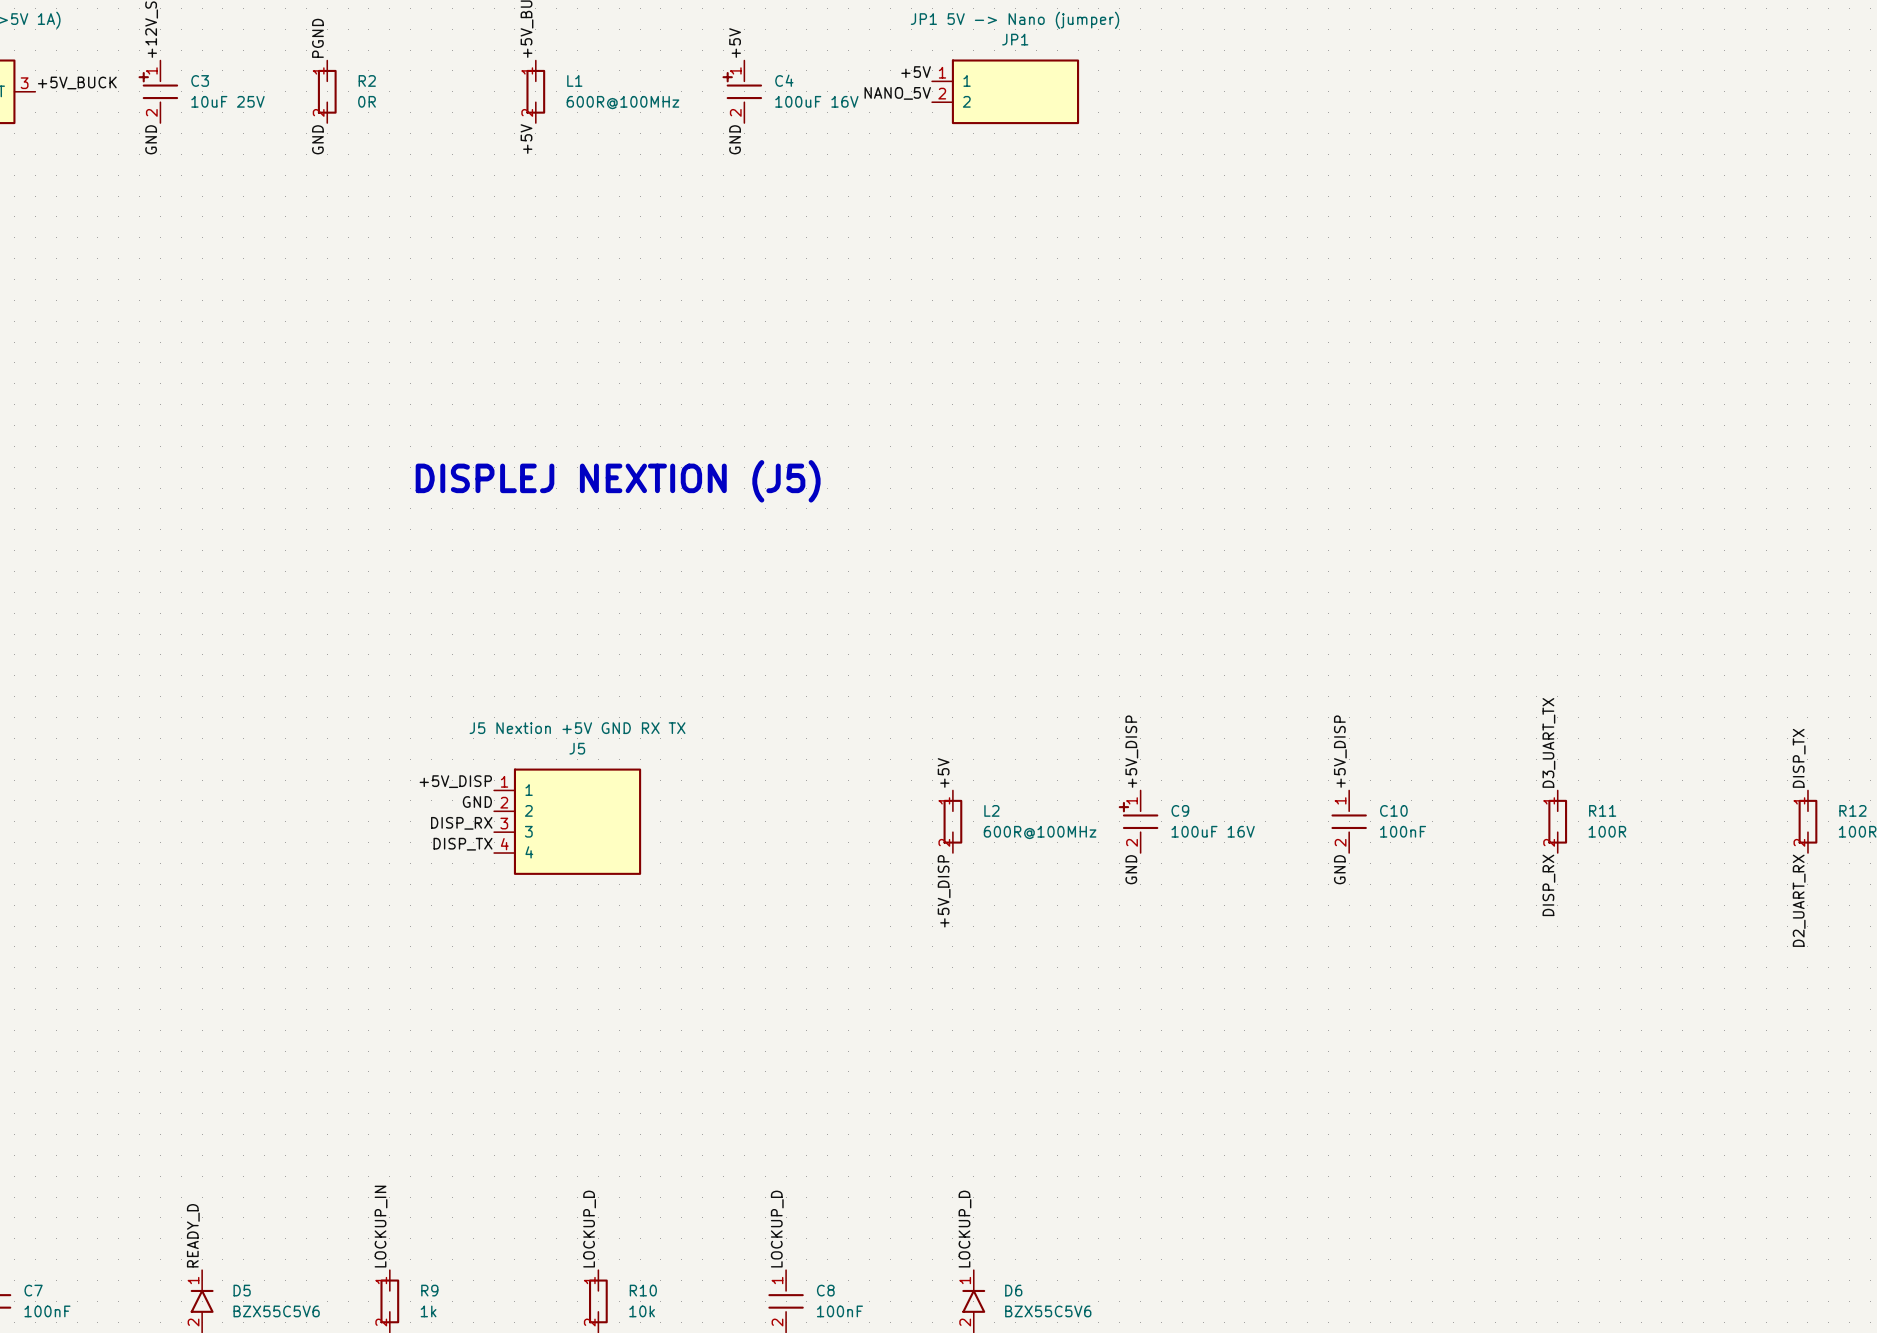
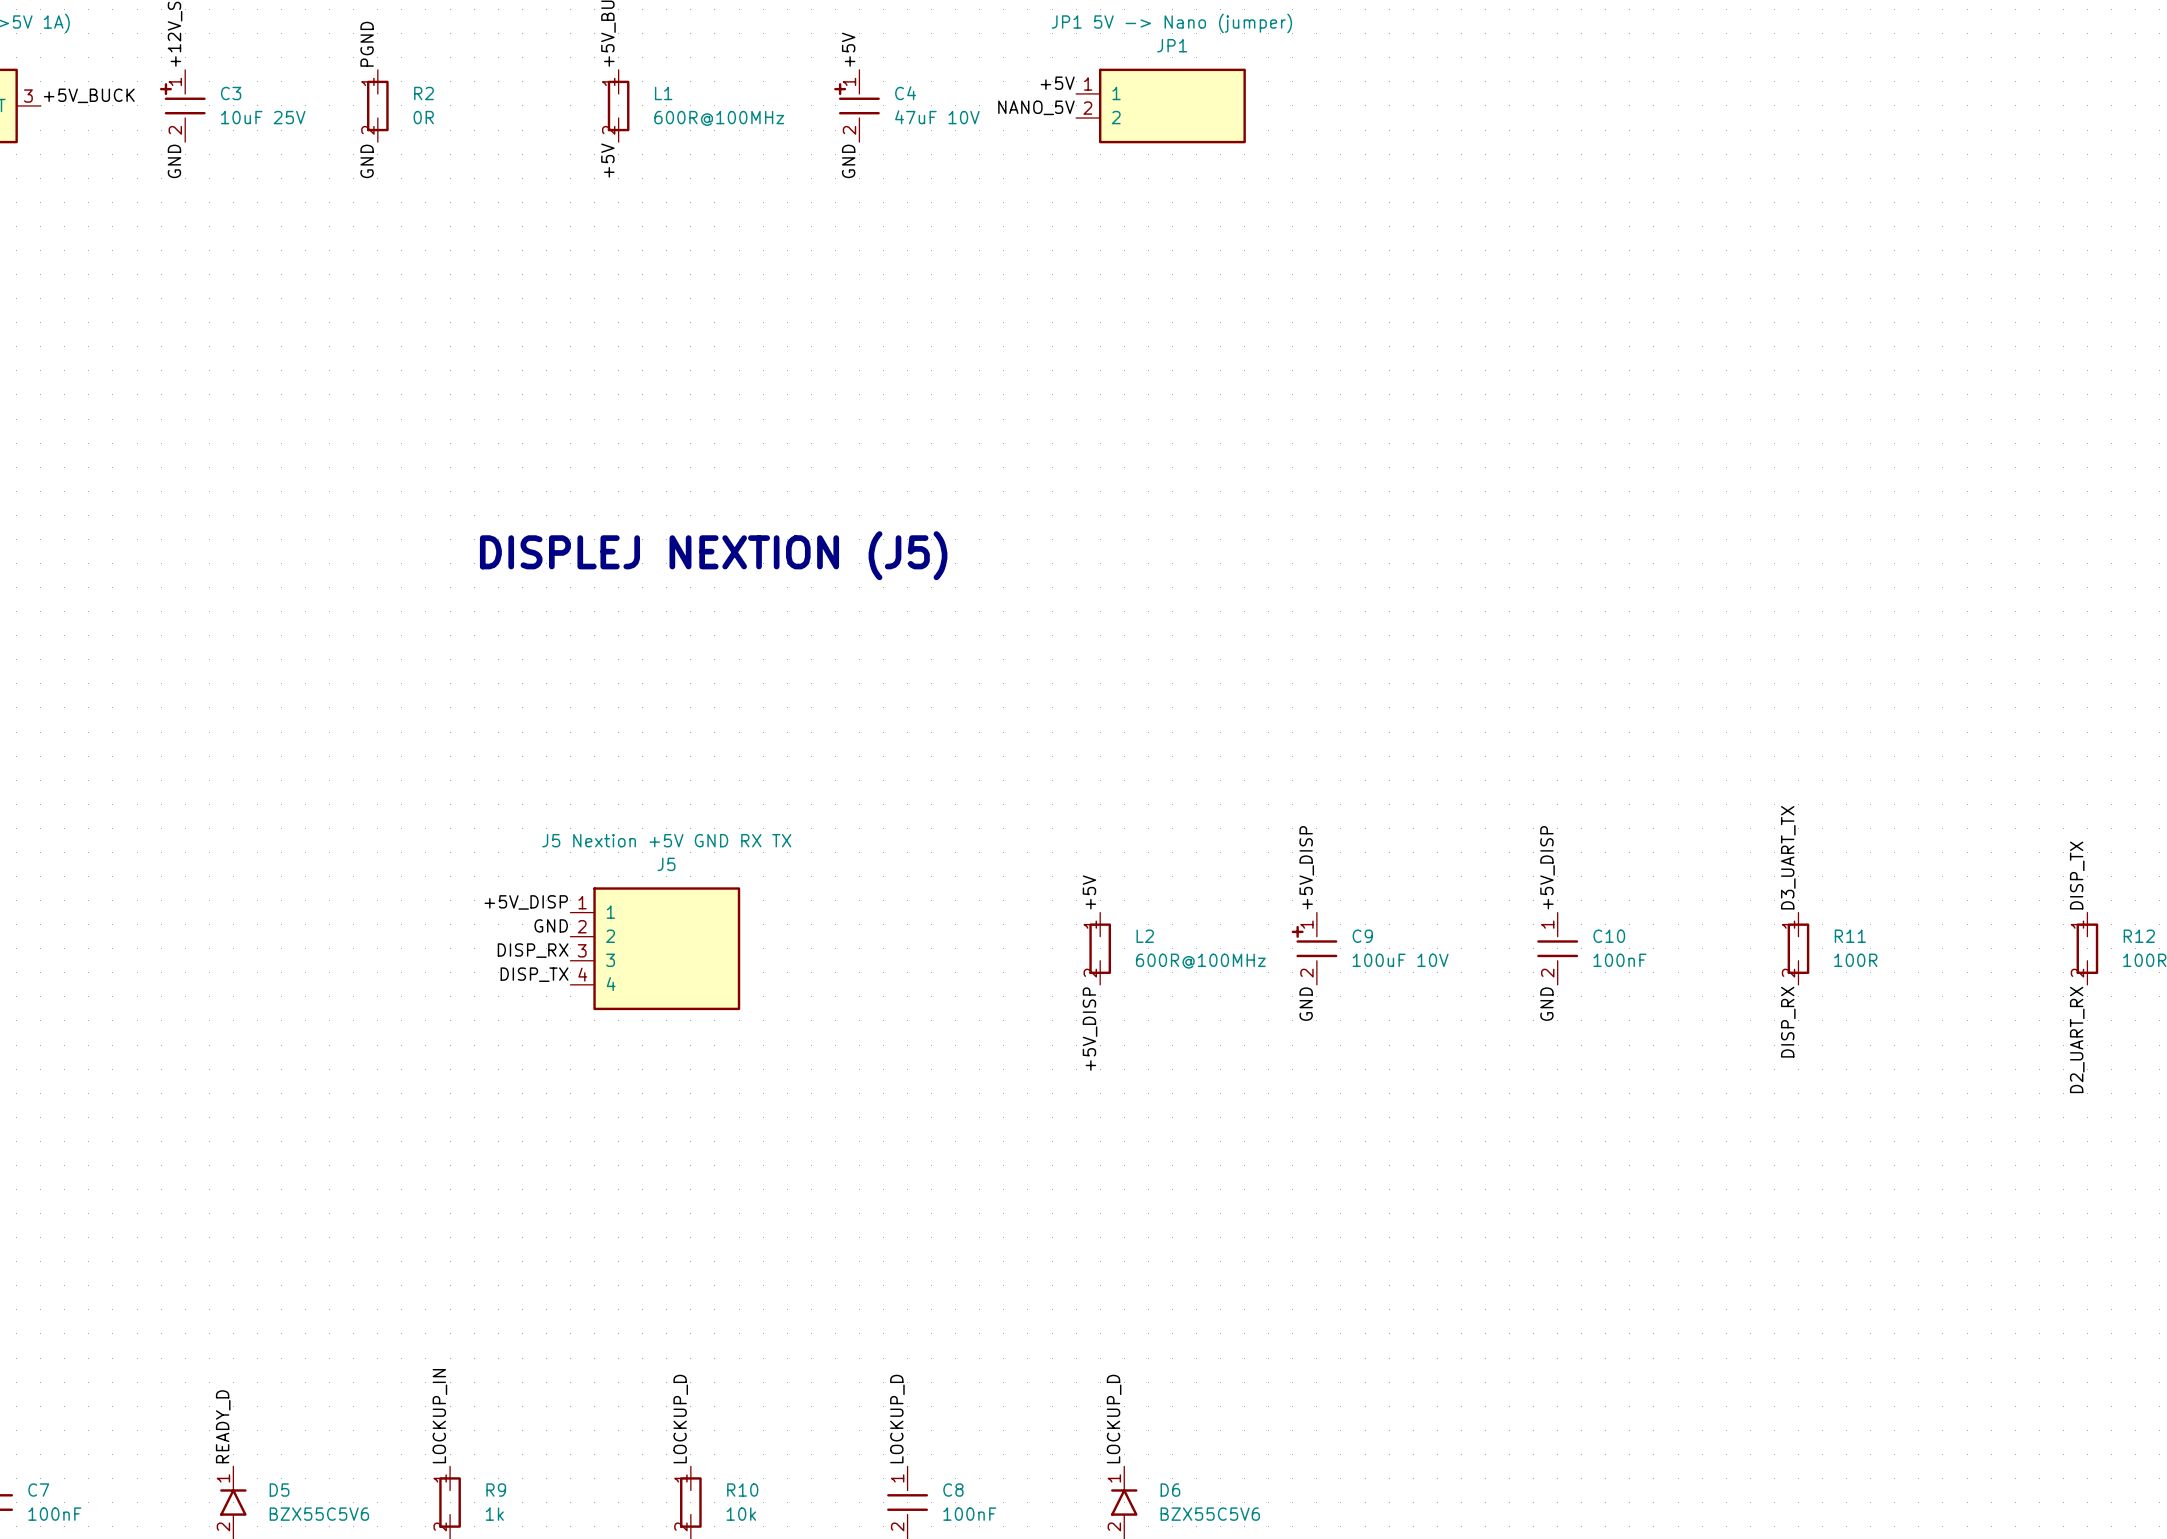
C4 value: 100uF 16V (816, 101) -> 47uF 10V (937, 117)
C9 value: 100uF 16V (1213, 831) -> 100uF 10V (1400, 960)

